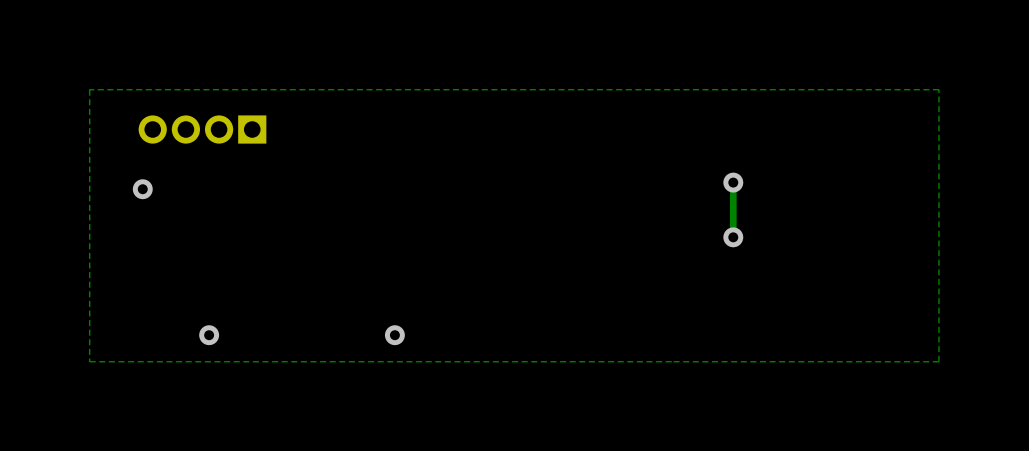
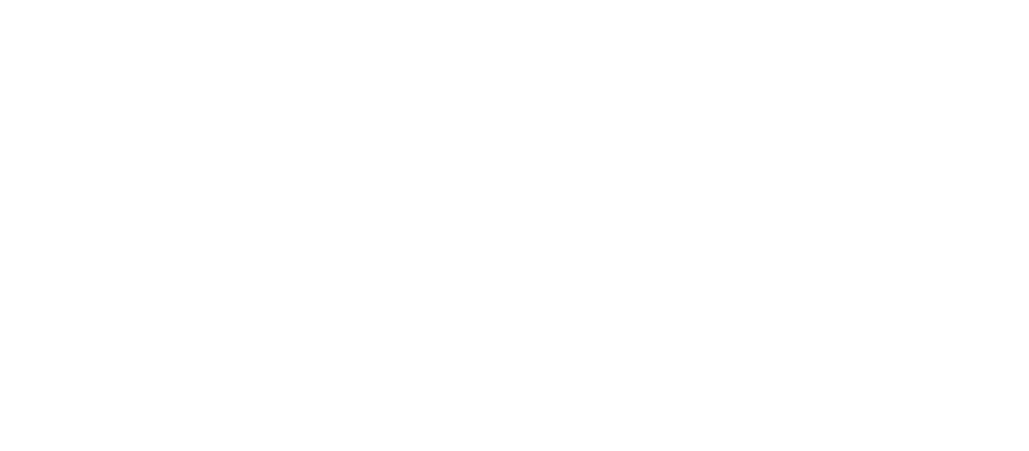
zone outline: (938, 89) (89, 89) (89, 361) (938, 361) (938, 89) -> none
part: (202, 129) -> none
track: (733, 182) (733, 237) -> none
via: (733, 182) -> none
via: (142, 189) -> none
via: (733, 237) -> none
via: (209, 335) -> none
via: (394, 335) -> none

